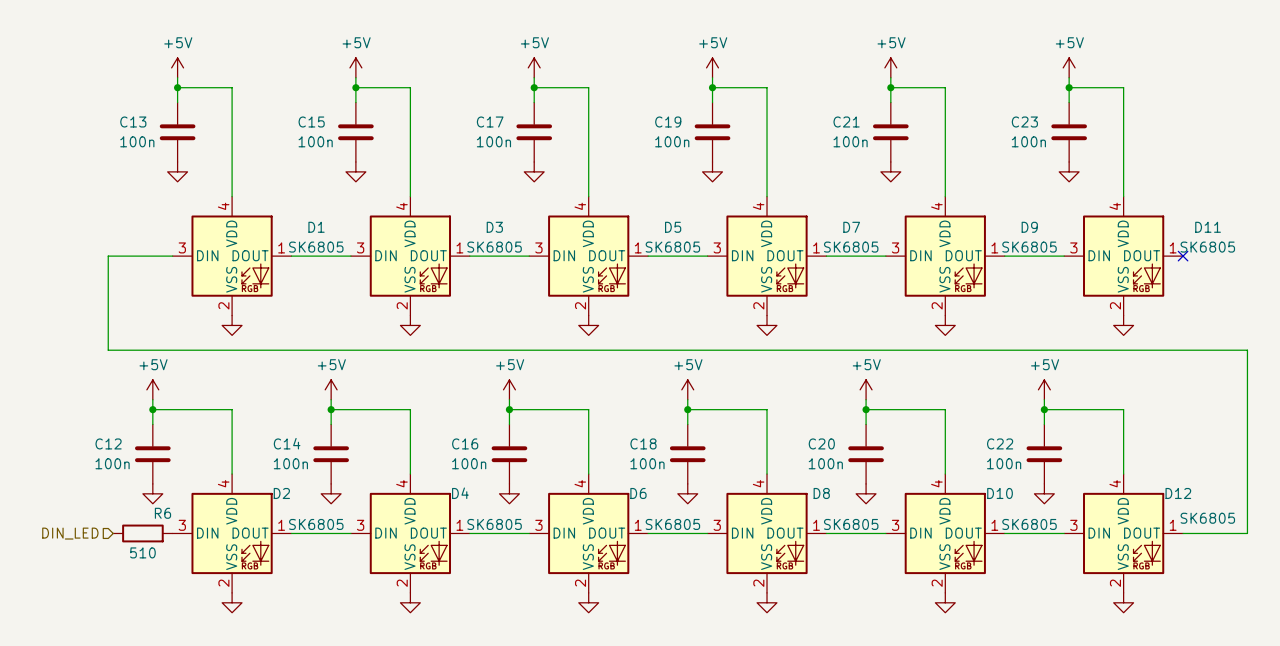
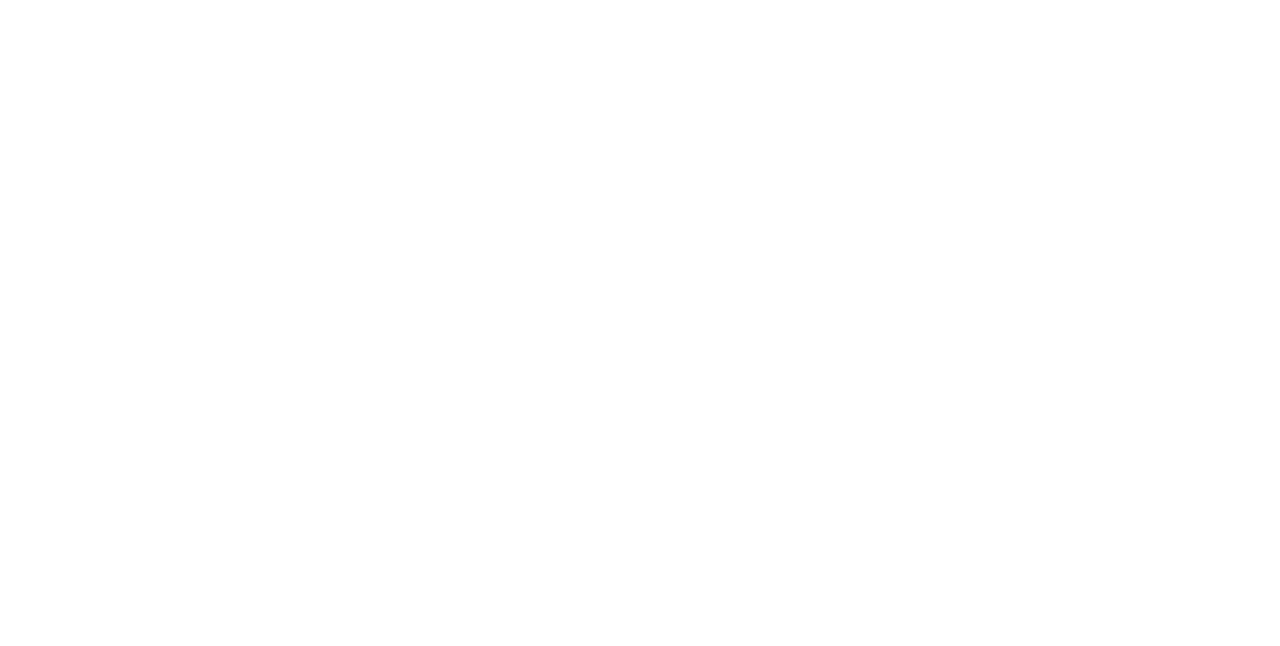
power symbol: +5V (177, 67) -> none
power symbol: +5V (355, 67) -> none
power symbol: +5V (534, 67) -> none
power symbol: +5V (712, 67) -> none
power symbol: +5V (890, 67) -> none
power symbol: +5V (1069, 67) -> none
wire: (177, 77) (177, 102) -> none
wire: (355, 77) (355, 102) -> none
wire: (534, 77) (534, 102) -> none
wire: (712, 77) (712, 102) -> none
wire: (890, 77) (890, 102) -> none
wire: (1069, 77) (1069, 102) -> none
wire: (177, 87) (232, 87) (232, 196) -> none
junction: (177, 87) -> none
wire: (355, 87) (410, 87) (410, 196) -> none
junction: (355, 87) -> none
wire: (534, 87) (588, 87) (588, 196) -> none
junction: (534, 87) -> none
wire: (712, 87) (767, 87) (767, 196) -> none
junction: (712, 87) -> none
wire: (890, 87) (945, 87) (945, 196) -> none
junction: (890, 87) -> none
wire: (1069, 87) (1123, 87) (1123, 196) -> none
junction: (1069, 87) -> none
C13: 100n (177, 132) -> none
C15: 100n (355, 132) -> none
C17: 100n (534, 132) -> none
C19: 100n (712, 132) -> none
C21: 100n (890, 132) -> none
C23: 100n (1069, 132) -> none
power symbol: (177, 171) -> none
power symbol: (355, 171) -> none
power symbol: (534, 171) -> none
power symbol: (712, 171) -> none
power symbol: (890, 171) -> none
power symbol: (1069, 171) -> none
wire: (172, 256) (108, 256) (108, 350) (1247, 350) (1247, 533) (1183, 533) -> none
D1: SK6805 (232, 256) -> none
wire: (291, 256) (350, 256) -> none
D3: SK6805 (410, 256) -> none
wire: (469, 256) (529, 256) -> none
D5: SK6805 (588, 256) -> none
wire: (648, 256) (707, 256) -> none
D7: SK6805 (767, 256) -> none
wire: (826, 256) (885, 256) -> none
D9: SK6805 (945, 256) -> none
wire: (1004, 256) (1064, 256) -> none
D11: SK6805 (1123, 256) -> none
no-connect mark: (1183, 256) -> none
power symbol: (232, 325) -> none
power symbol: (410, 325) -> none
power symbol: (588, 325) -> none
power symbol: (767, 325) -> none
power symbol: (945, 325) -> none
power symbol: (1123, 325) -> none
power symbol: +5V (152, 389) -> none
power symbol: +5V (331, 389) -> none
power symbol: +5V (509, 389) -> none
power symbol: +5V (687, 389) -> none
power symbol: +5V (866, 389) -> none
power symbol: +5V (1044, 389) -> none
wire: (152, 399) (152, 424) -> none
wire: (331, 399) (331, 424) -> none
wire: (509, 399) (509, 424) -> none
wire: (687, 399) (687, 424) -> none
wire: (866, 399) (866, 424) -> none
wire: (1044, 399) (1044, 424) -> none
wire: (152, 409) (232, 409) (232, 474) -> none
junction: (152, 409) -> none
wire: (331, 409) (410, 409) (410, 474) -> none
junction: (331, 409) -> none
wire: (509, 409) (588, 409) (588, 474) -> none
junction: (509, 409) -> none
wire: (687, 409) (767, 409) (767, 474) -> none
junction: (687, 409) -> none
wire: (866, 409) (945, 409) (945, 474) -> none
junction: (866, 409) -> none
wire: (1044, 409) (1123, 409) (1123, 474) -> none
junction: (1044, 409) -> none
C12: 100n (152, 454) -> none
C14: 100n (331, 454) -> none
C16: 100n (509, 454) -> none
C18: 100n (687, 454) -> none
C20: 100n (866, 454) -> none
C22: 100n (1044, 454) -> none
power symbol: (152, 493) -> none
power symbol: (331, 493) -> none
power symbol: (509, 493) -> none
power symbol: (687, 493) -> none
power symbol: (866, 493) -> none
power symbol: (1044, 493) -> none
hierarchical label: DIN_LED (70, 533) -> none
R6: 510 (142, 533) -> none
D2: SK6805 (232, 533) -> none
wire: (291, 533) (350, 533) -> none
D4: SK6805 (410, 533) -> none
wire: (469, 533) (529, 533) -> none
D6: SK6805 (588, 533) -> none
wire: (648, 533) (707, 533) -> none
D8: SK6805 (767, 533) -> none
wire: (826, 533) (885, 533) -> none
D10: SK6805 (945, 533) -> none
wire: (1004, 533) (1064, 533) -> none
D12: SK6805 (1123, 533) -> none
power symbol: (232, 602) -> none
power symbol: (410, 602) -> none
power symbol: (588, 602) -> none
power symbol: (767, 602) -> none
power symbol: (945, 602) -> none
power symbol: (1123, 602) -> none

